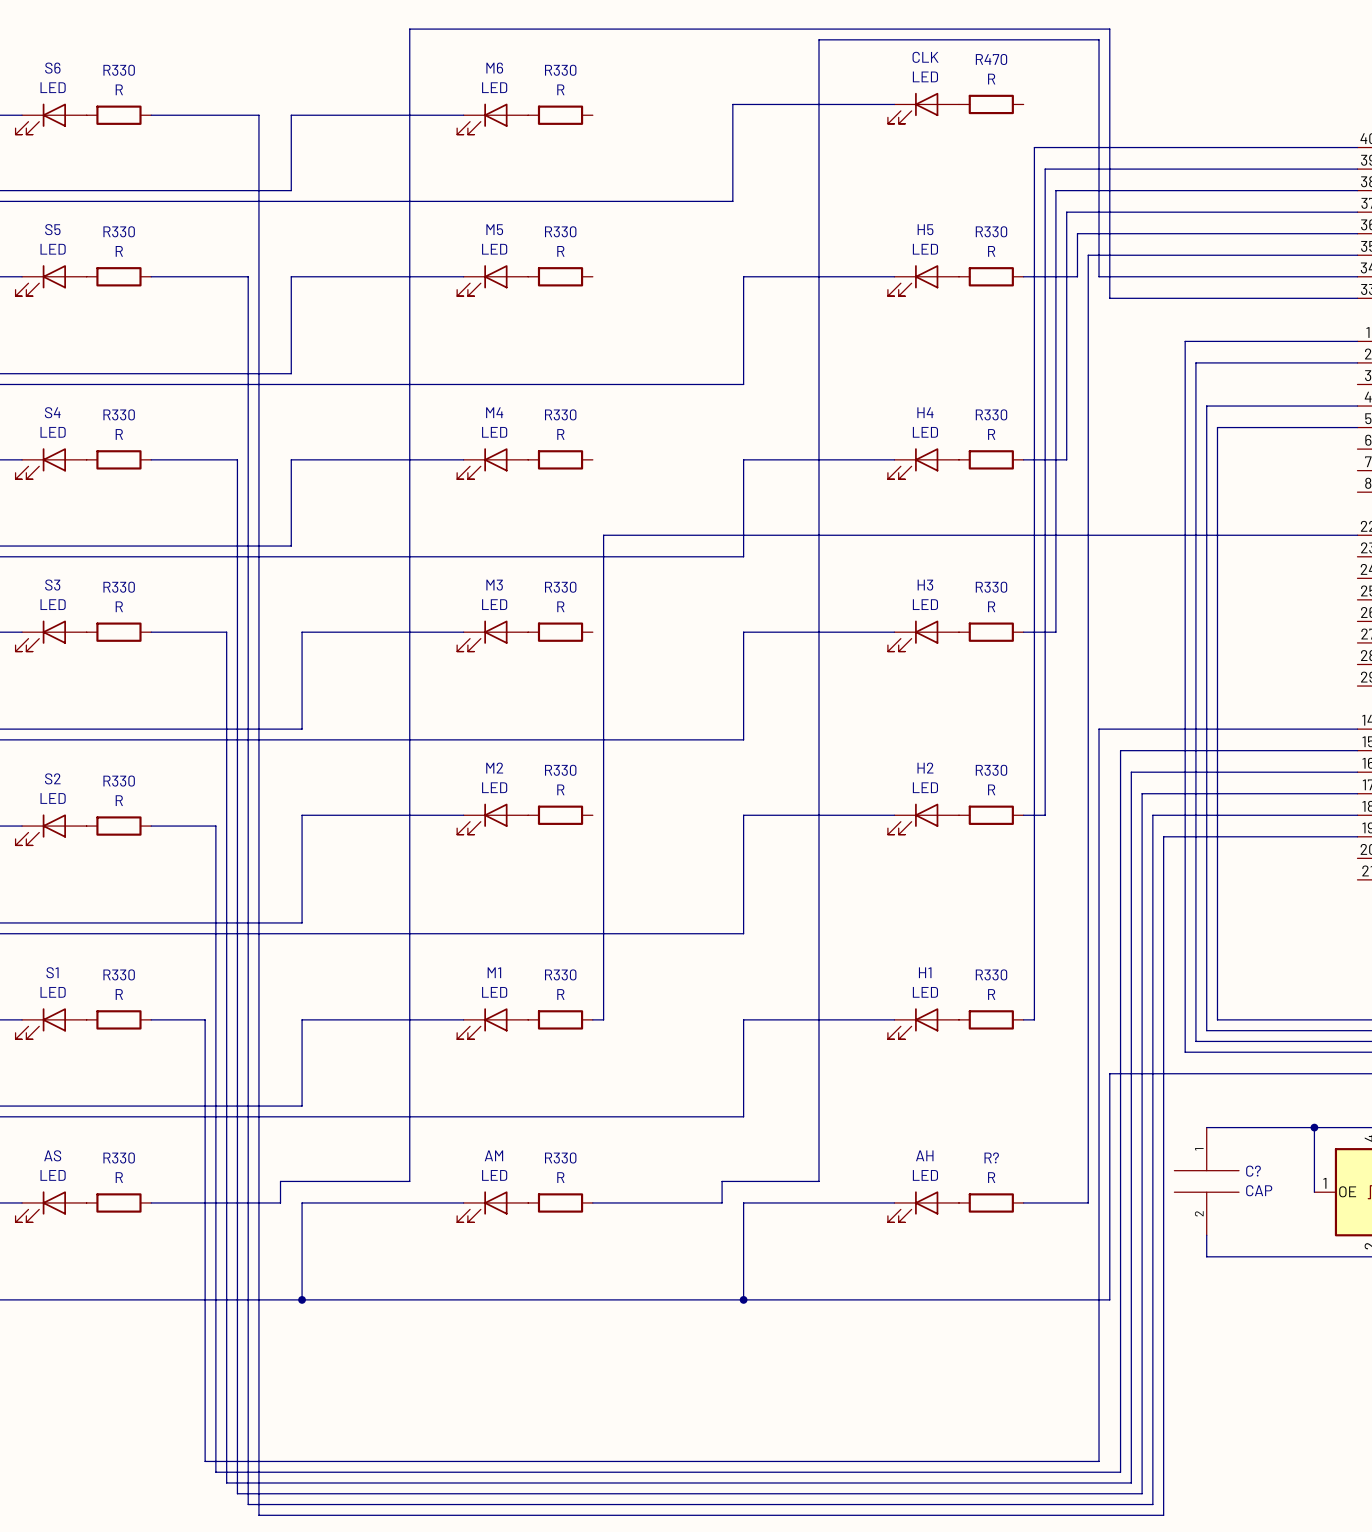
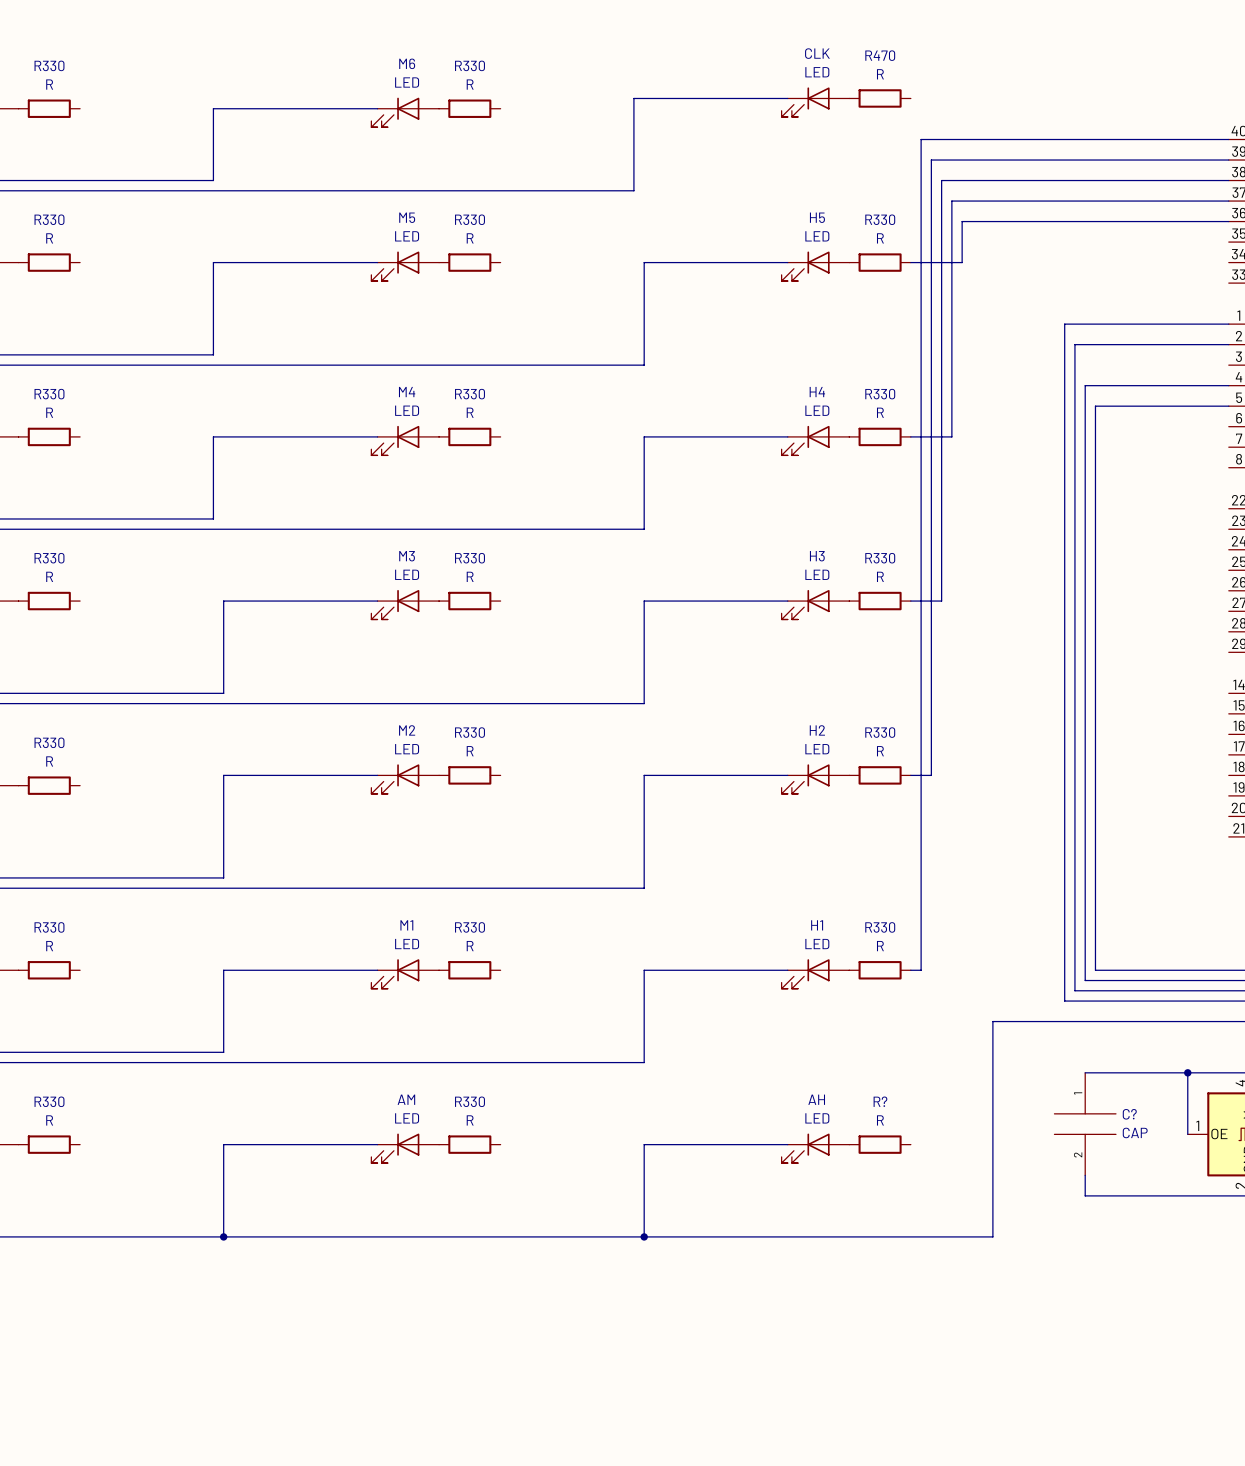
wire: (151, 115) (258, 115) (258, 1515) (1163, 1515) (1163, 836) (1357, 836) -> none
wire: (1357, 255) (1088, 255) (1088, 1202) (1023, 1202) -> none
wire: (151, 276) (248, 276) (248, 1504) (1152, 1504) (1152, 815) (1357, 815) -> none
wire: (1357, 276) (1099, 276) (1099, 39) (819, 39) (819, 1181) (722, 1181) (722, 1202) (592, 1202) -> none
wire: (1357, 298) (1109, 298) (1109, 29) (409, 29) (409, 1181) (280, 1181) (280, 1202) (151, 1202) -> none
wire: (151, 459) (237, 459) (237, 1493) (1142, 1493) (1142, 793) (1357, 793) -> none
wire: (1357, 535) (603, 535) (603, 1019) (592, 1019) -> none
wire: (151, 632) (226, 632) (226, 1482) (1131, 1482) (1131, 772) (1357, 772) -> none
wire: (1357, 729) (1099, 729) (1099, 1461) (205, 1461) (205, 1019) (151, 1019) -> none
wire: (1357, 750) (1120, 750) (1120, 1472) (215, 1472) (215, 826) (151, 826) -> none

